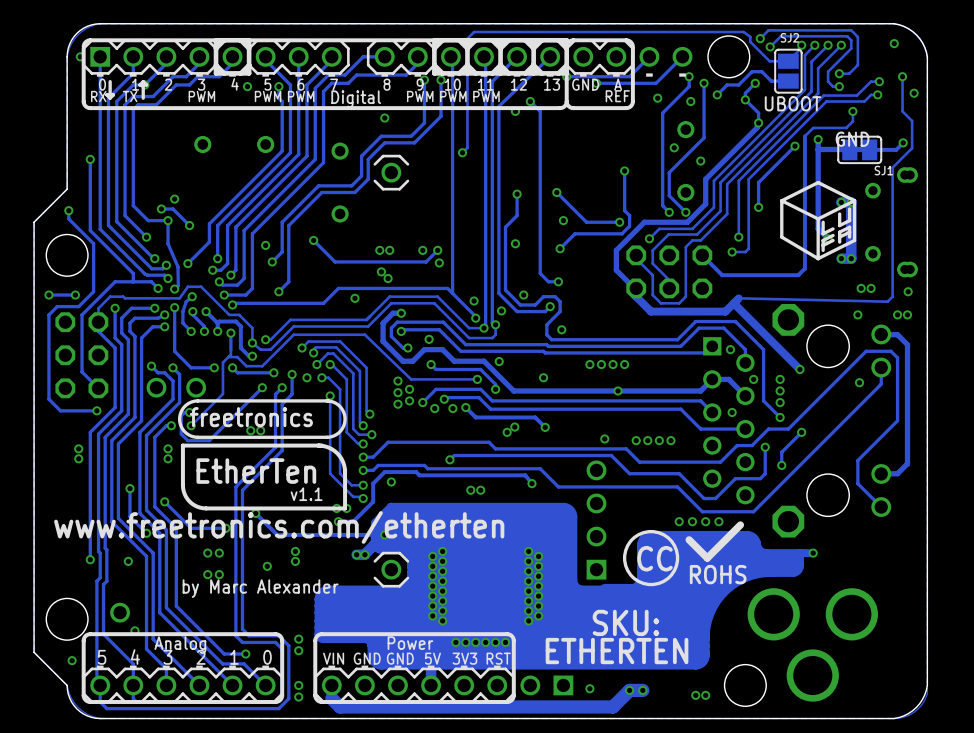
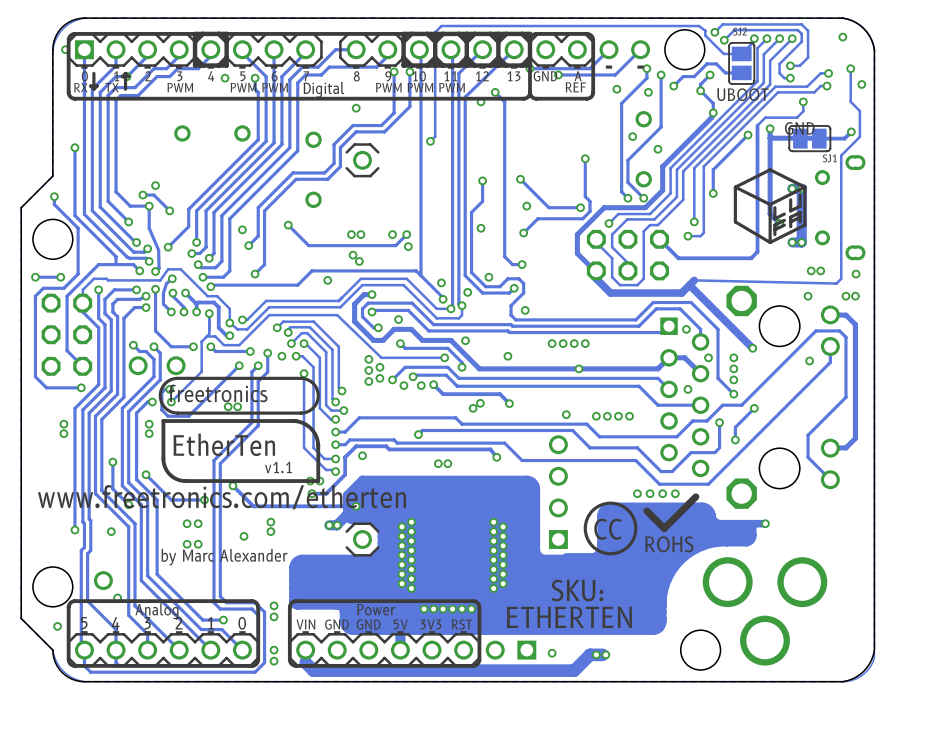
via: (629, 690) -> none
via: none -> (596, 654)
via: (642, 690) -> none
via: none -> (605, 654)
via: (695, 695) -> none
via: (705, 695) -> none

